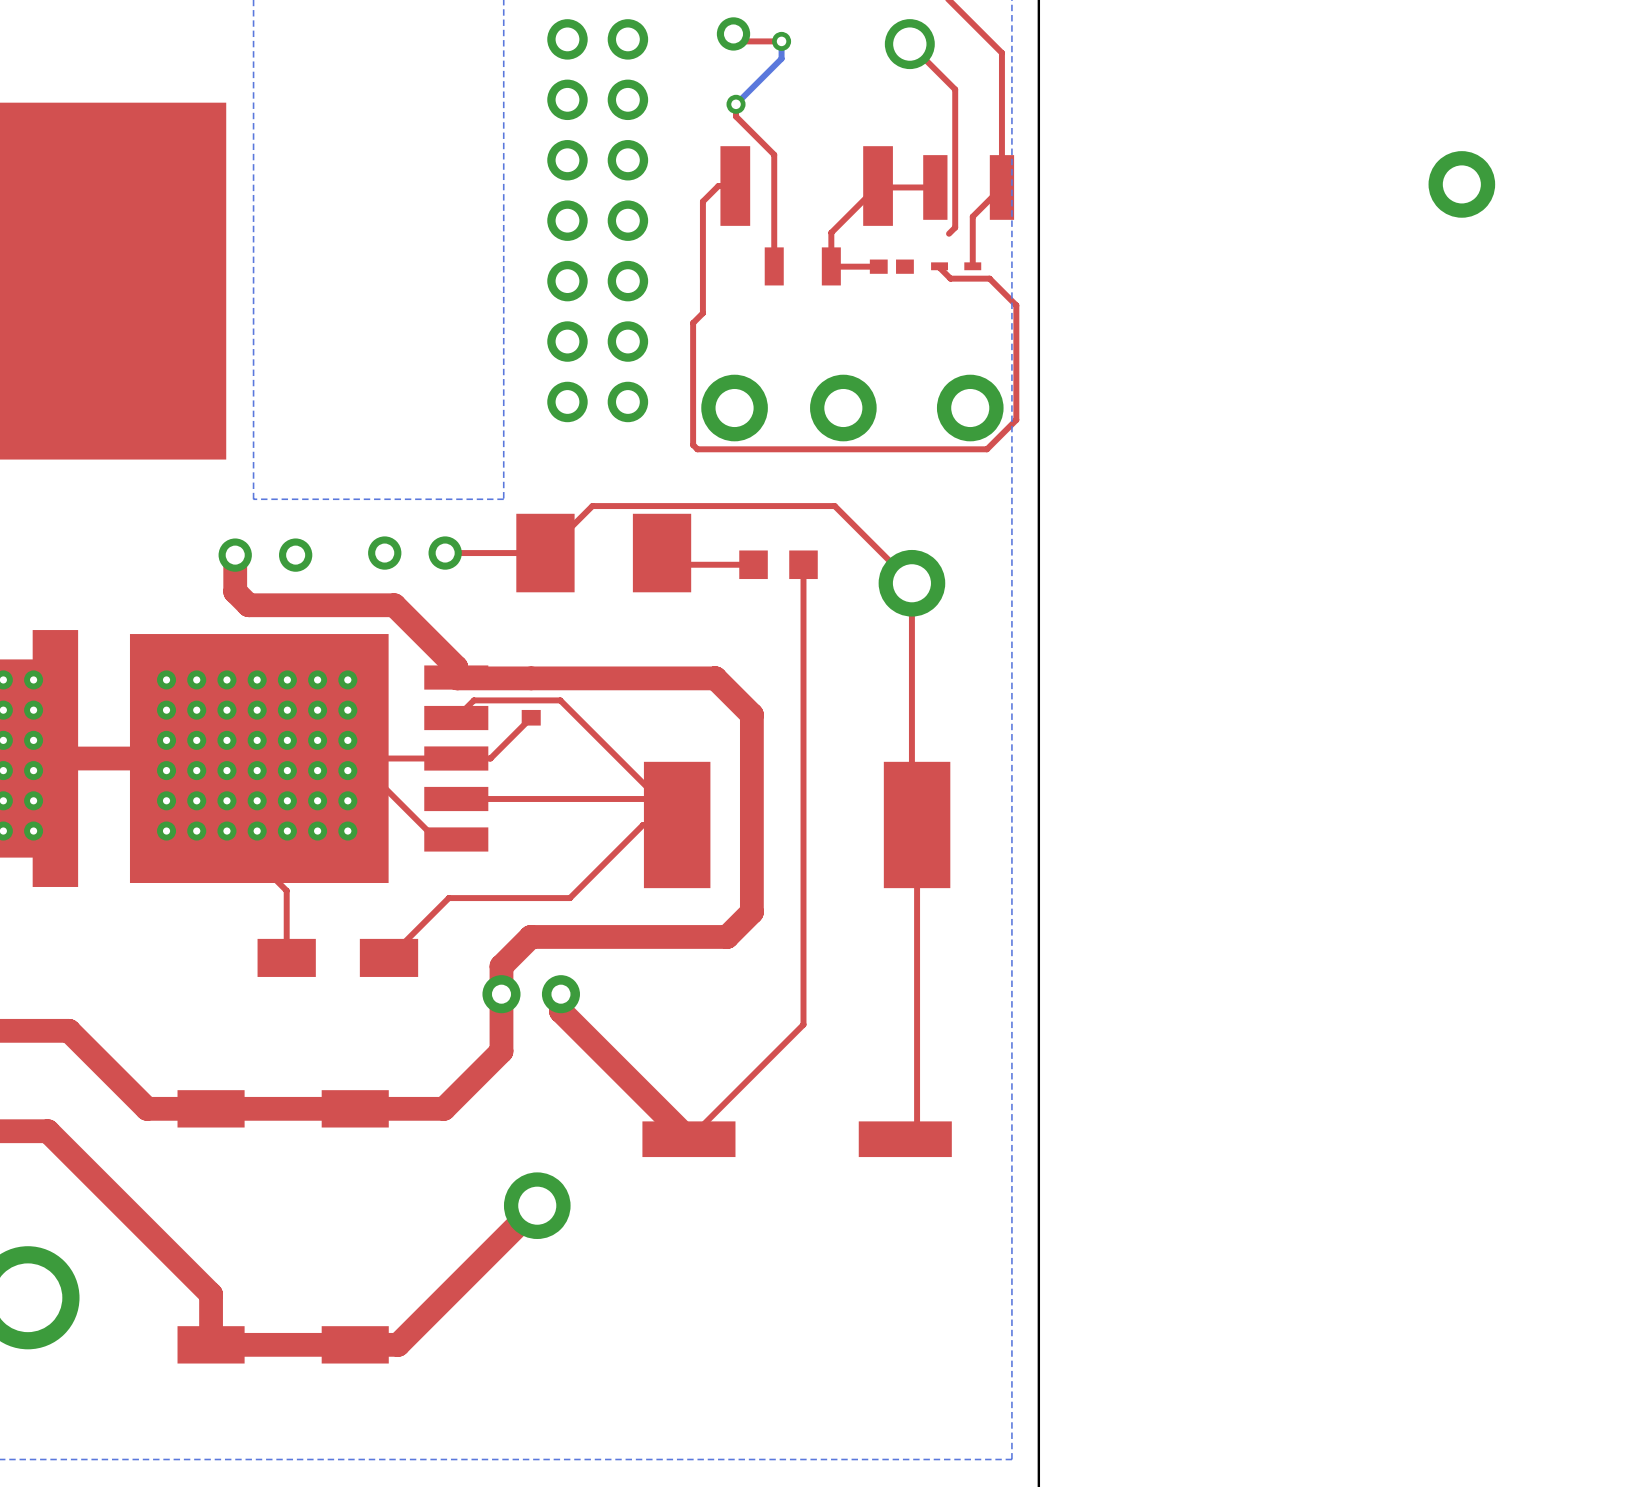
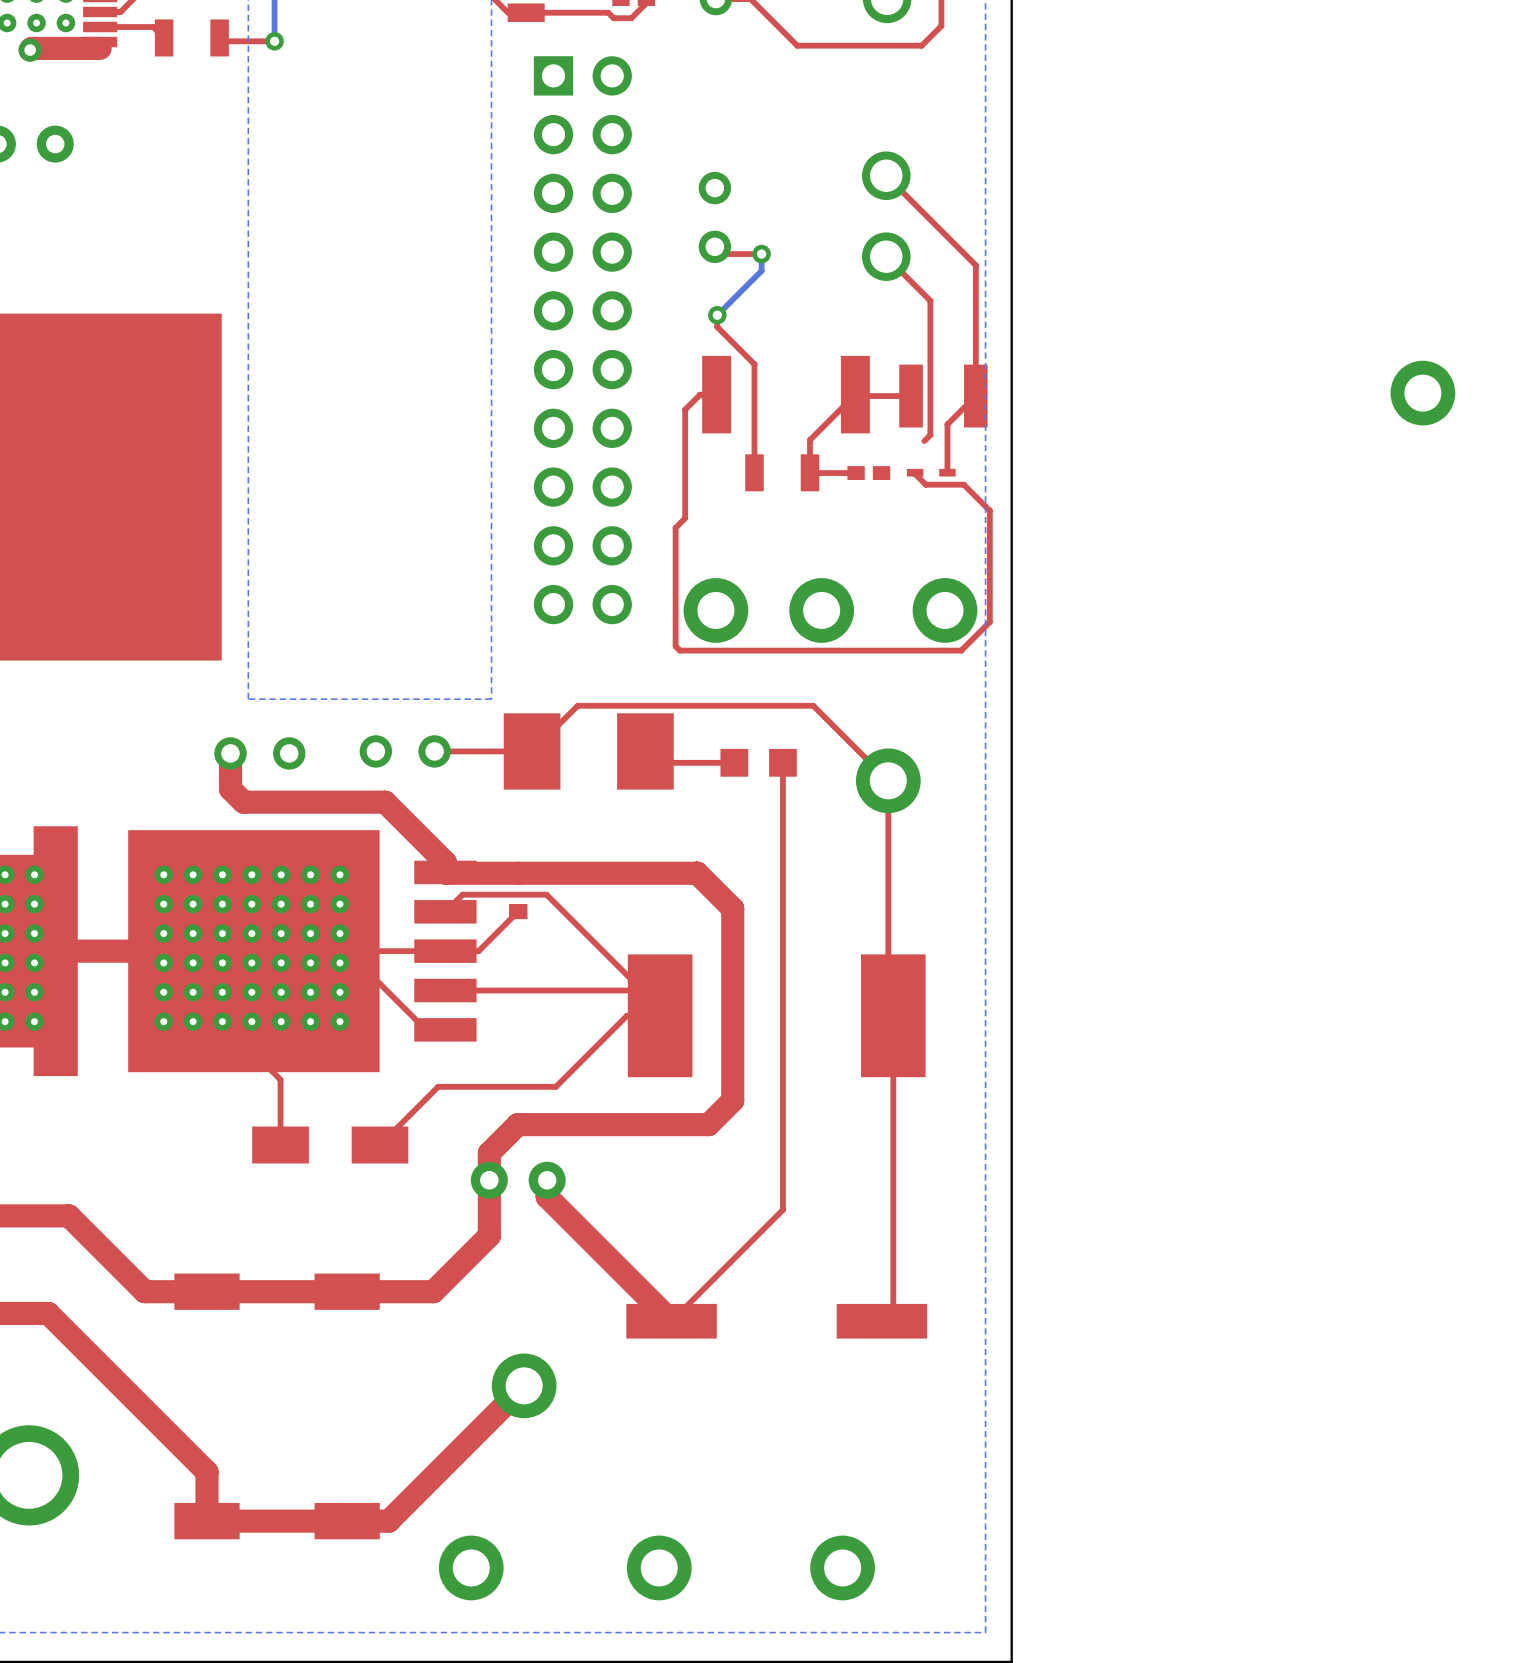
part: none -> (471, 1567)
part: none -> (659, 1567)
part: none -> (842, 1567)

